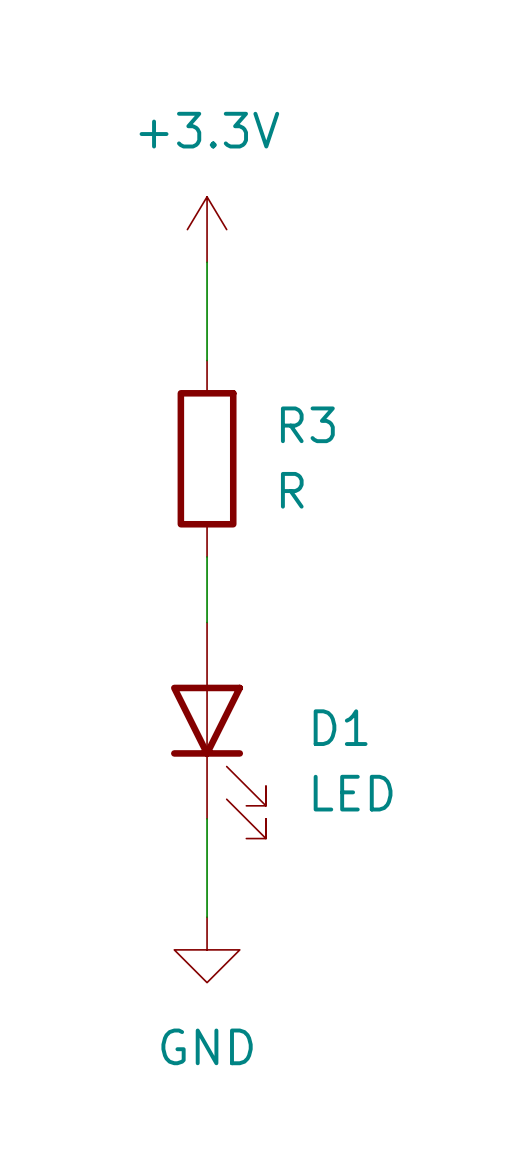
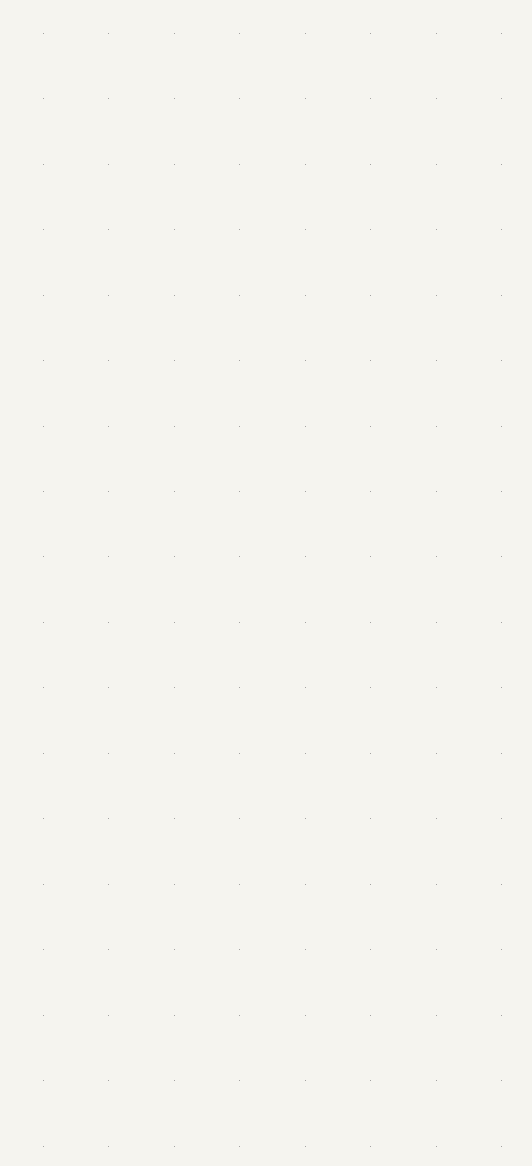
power symbol: +3.3V (207, 229) -> none
wire: (207, 262) (207, 360) -> none
R3: R (207, 458) -> none
wire: (207, 556) (207, 622) -> none
D1: LED (218, 730) -> none
wire: (207, 818) (207, 917) -> none
power symbol: GND (207, 949) -> none

